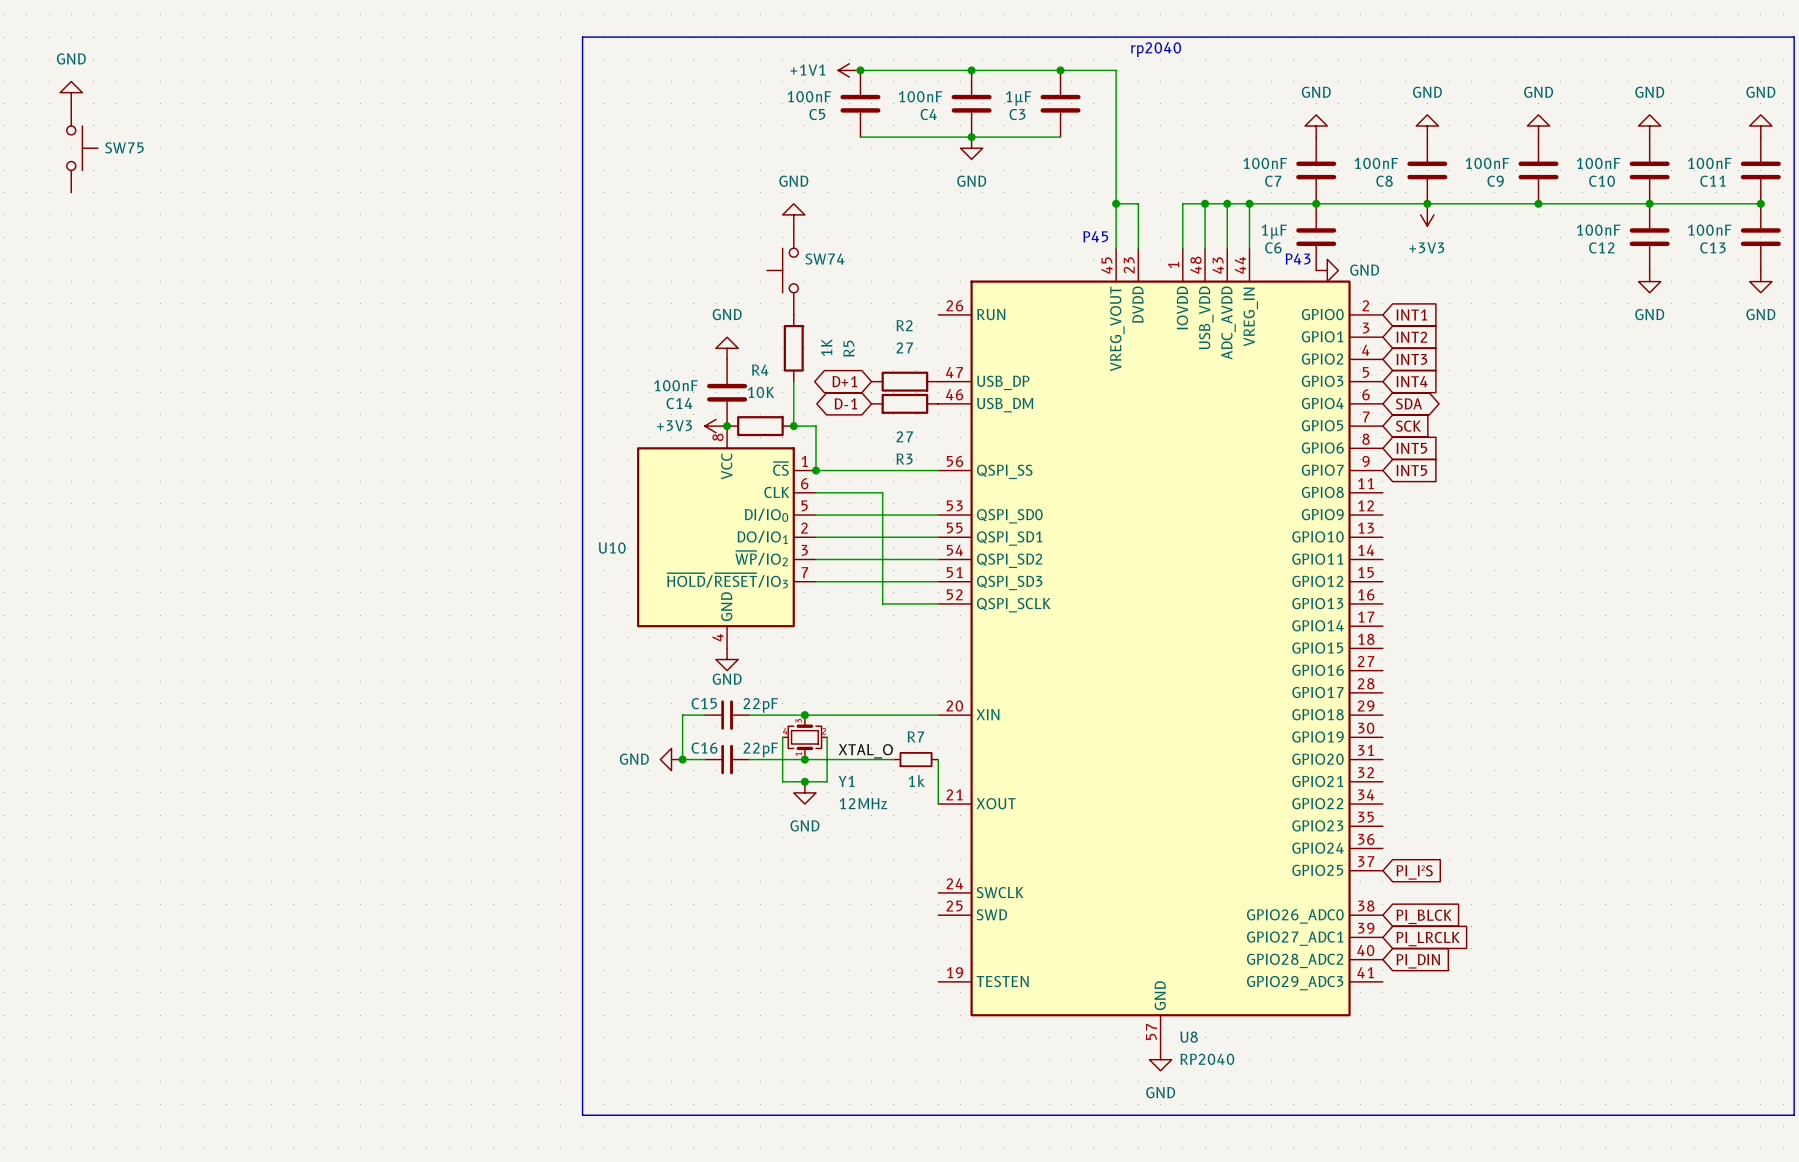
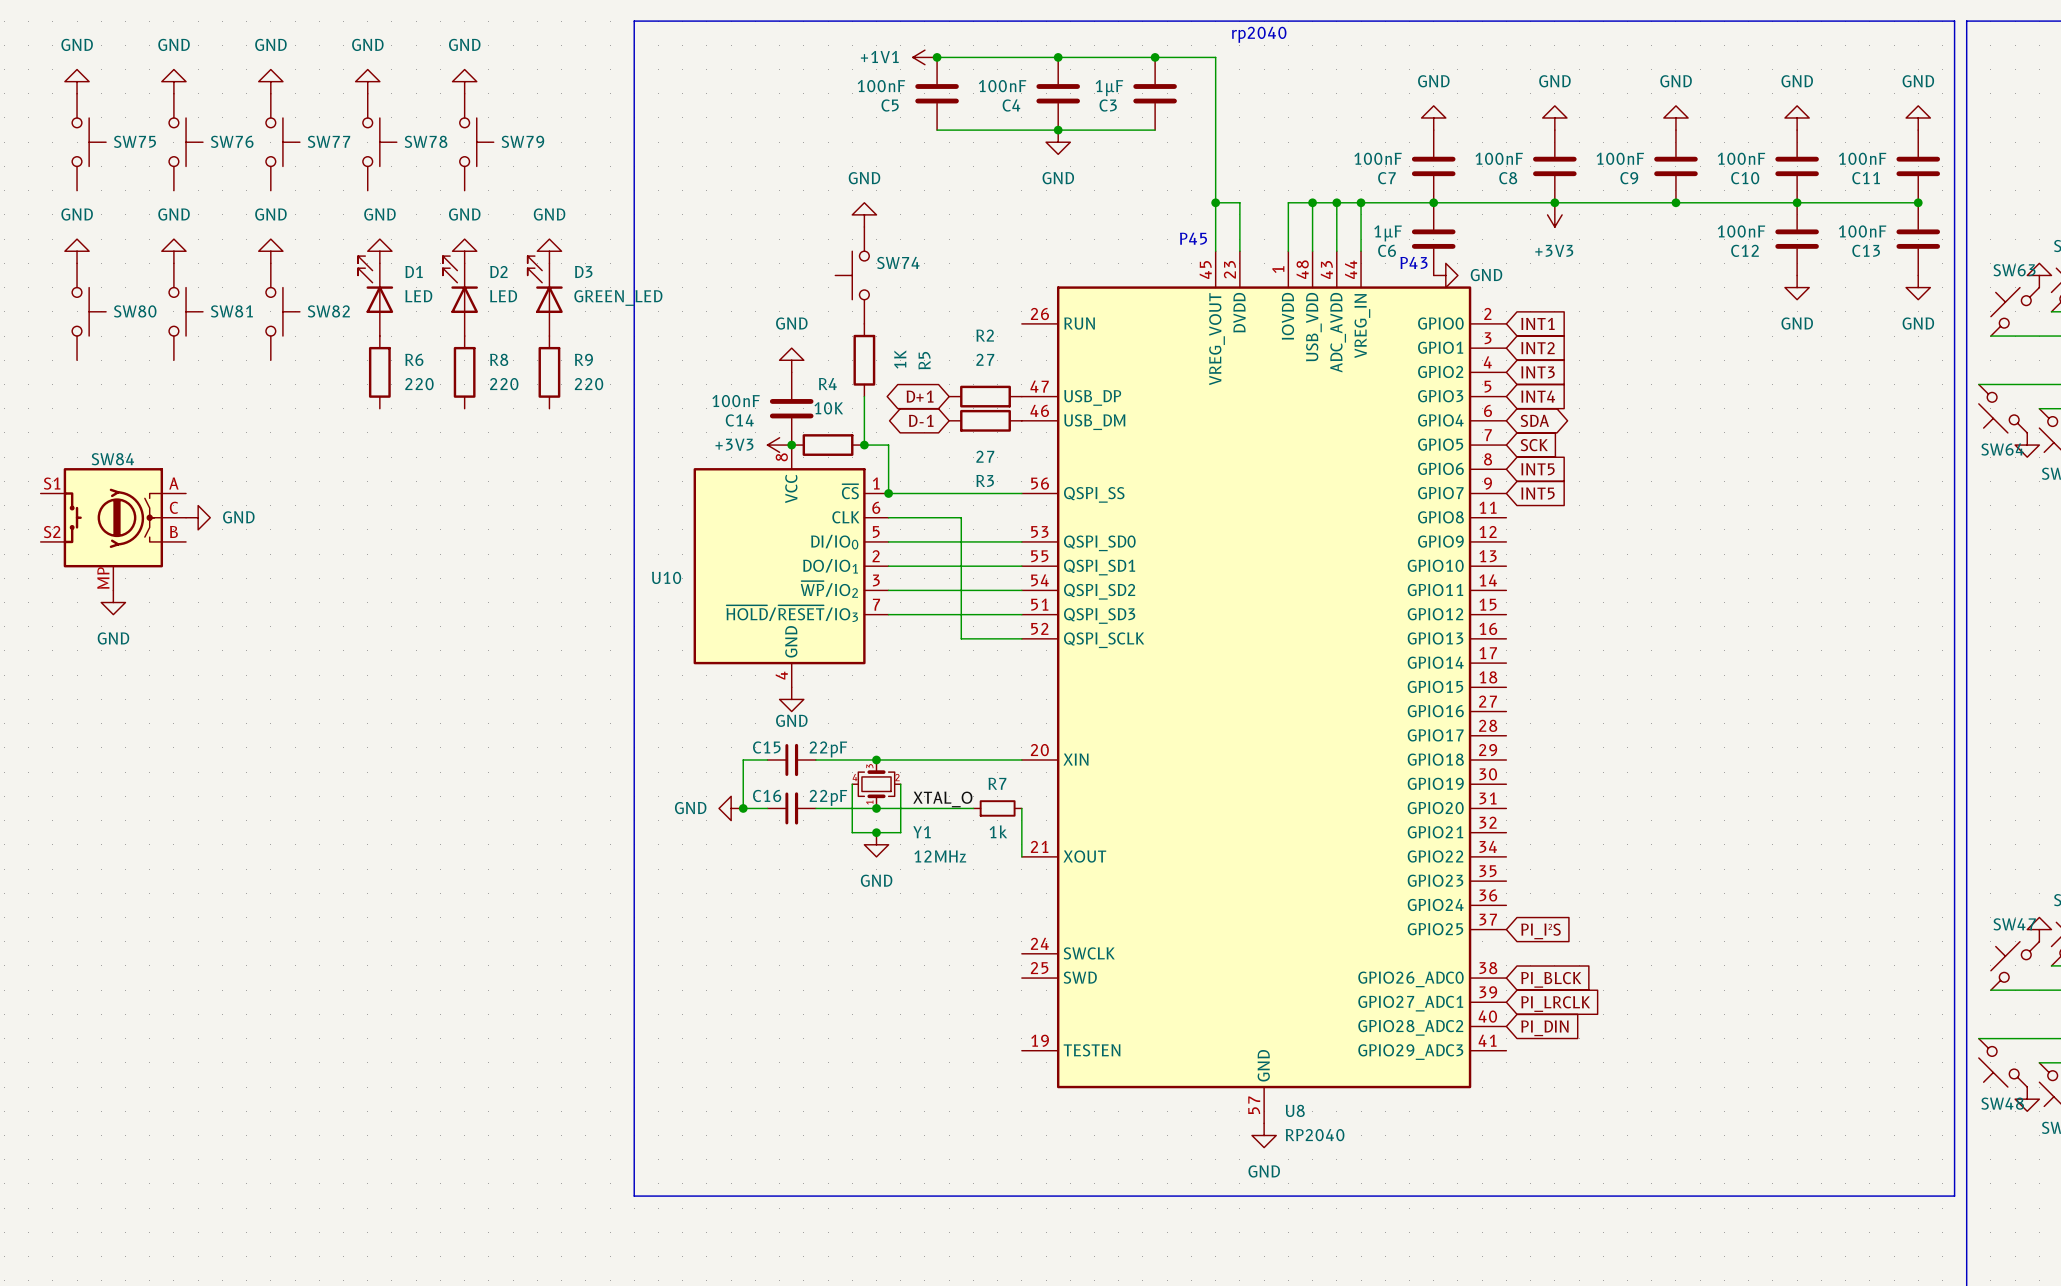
power symbol: none -> GND (173, 81)
power symbol: none -> GND (270, 81)
power symbol: none -> GND (367, 81)
power symbol: none -> GND (464, 81)
SW76: none -> (186, 142)
SW77: none -> (282, 142)
SW78: none -> (379, 142)
SW79: none -> (476, 142)
power symbol: none -> GND (77, 251)
power symbol: none -> GND (173, 251)
power symbol: none -> GND (270, 251)
power symbol: none -> GND (379, 251)
power symbol: none -> GND (464, 251)
power symbol: none -> GND (549, 251)
D1: none -> LED (375, 296)
D2: none -> LED (460, 296)
D3: none -> GREEN_LED (545, 296)
SW80: none -> (89, 311)
SW81: none -> (186, 311)
SW82: none -> (282, 311)
R6: none -> 220 (379, 372)
R8: none -> 220 (464, 372)
R9: none -> 220 (549, 372)
power symbol: none -> GND (198, 517)
SW84: none -> (113, 529)
power symbol: none -> GND (113, 602)

